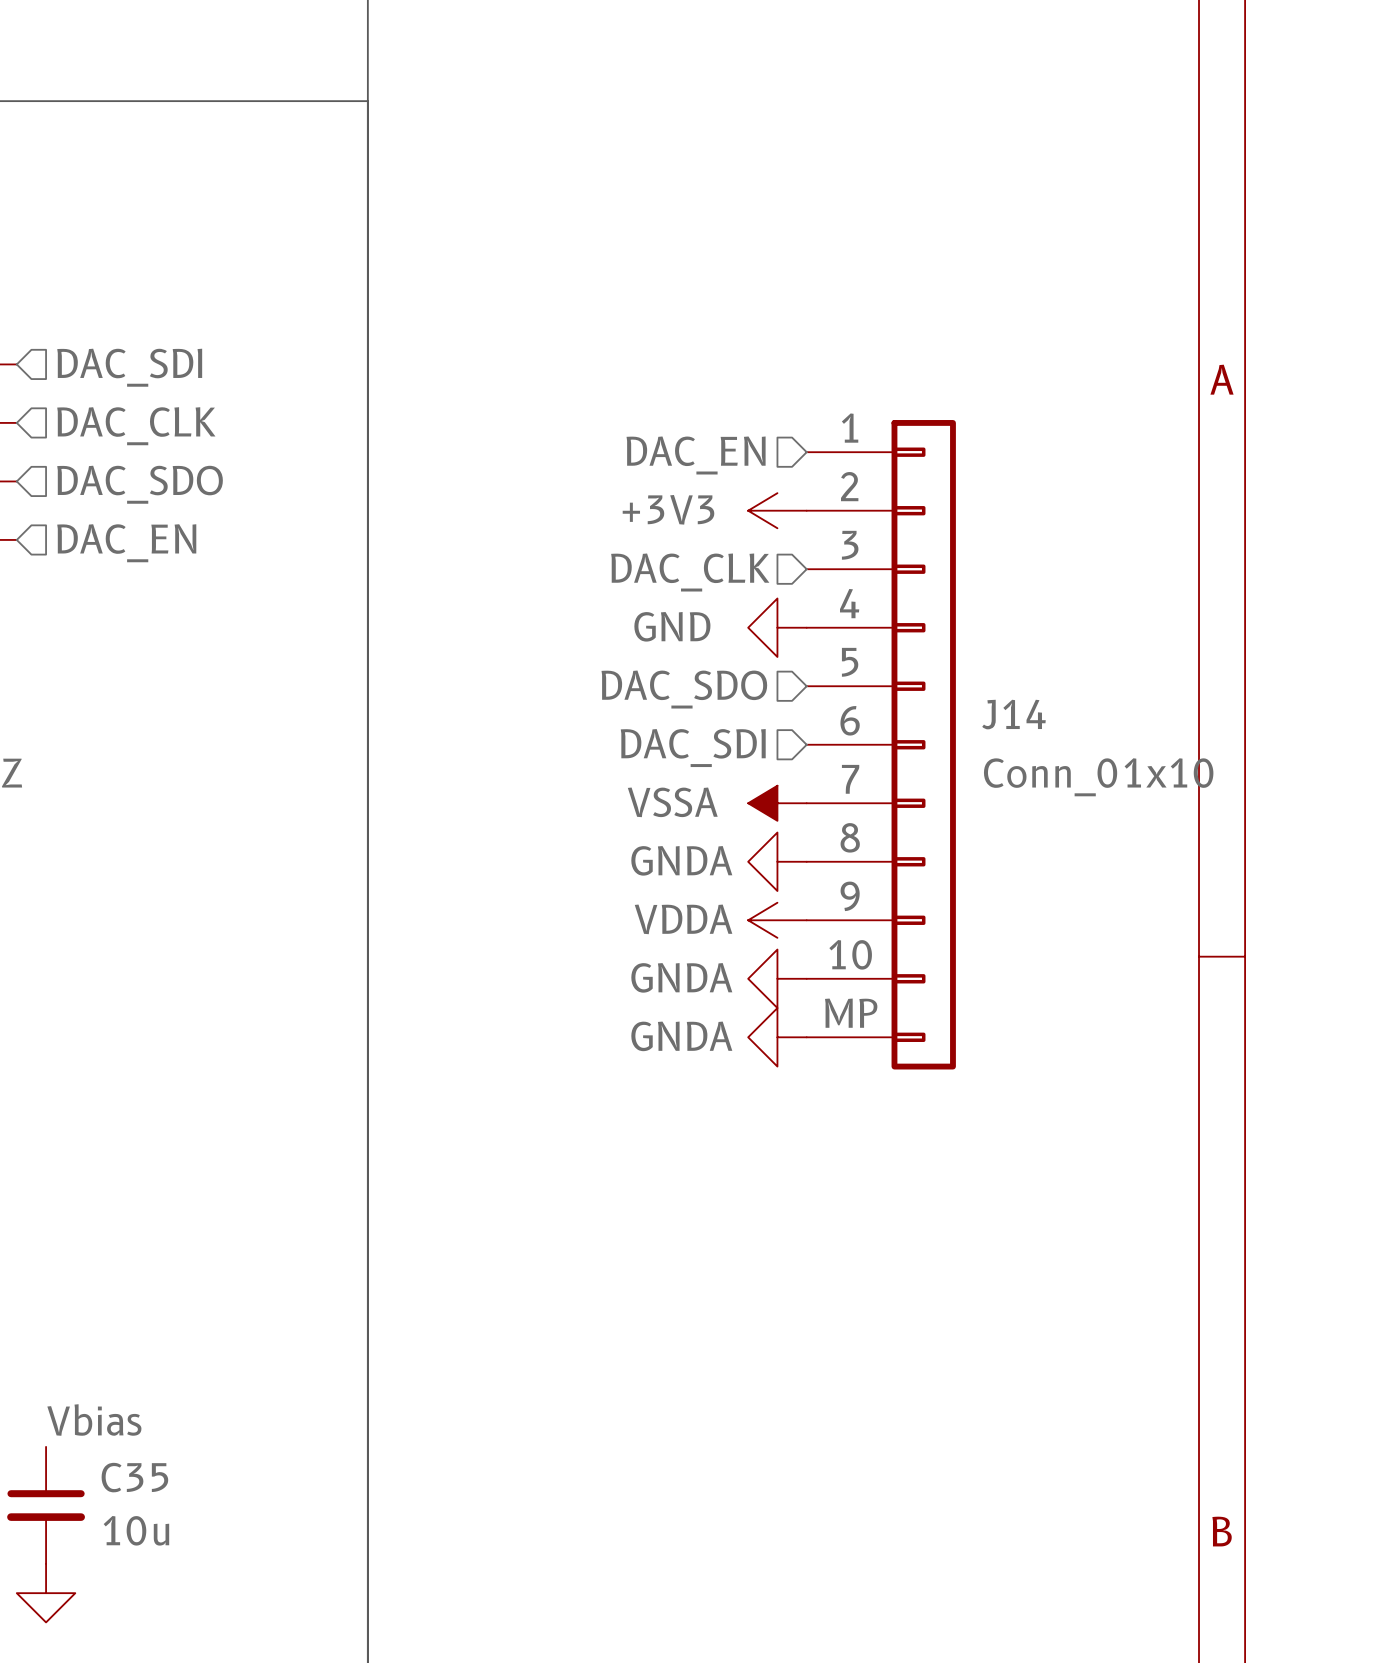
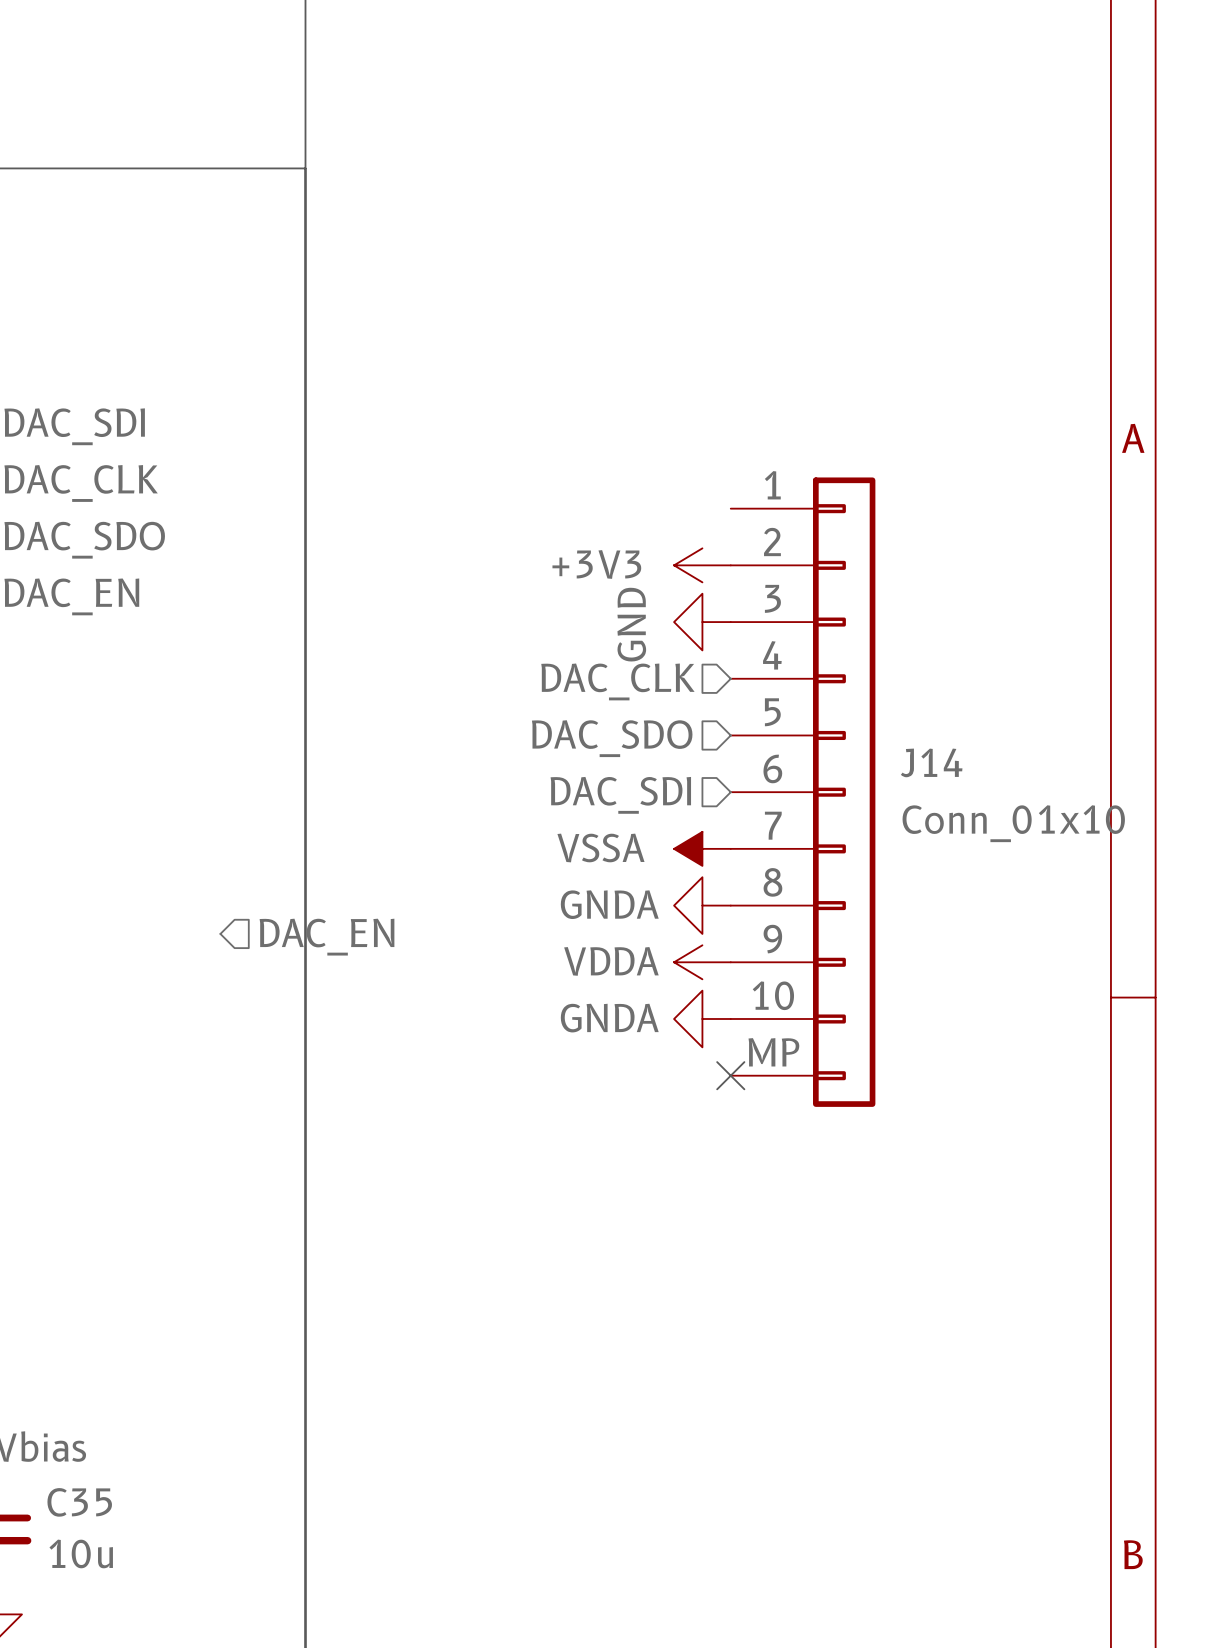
hierarchical label: DAC_EN (696, 455) -> none
hierarchical label position: DAC_CLK (690, 572) -> DAC_CLK (617, 681)
power symbol text rotation: 0° (672, 626) -> 90° counterclockwise (631, 624)
power symbol position: GND (777, 627) -> GND (702, 622)
hierarchical label: none -> DAC_EN (327, 937)
power symbol: GNDA (777, 1037) -> none
no-connect mark: none -> (730, 1075)

